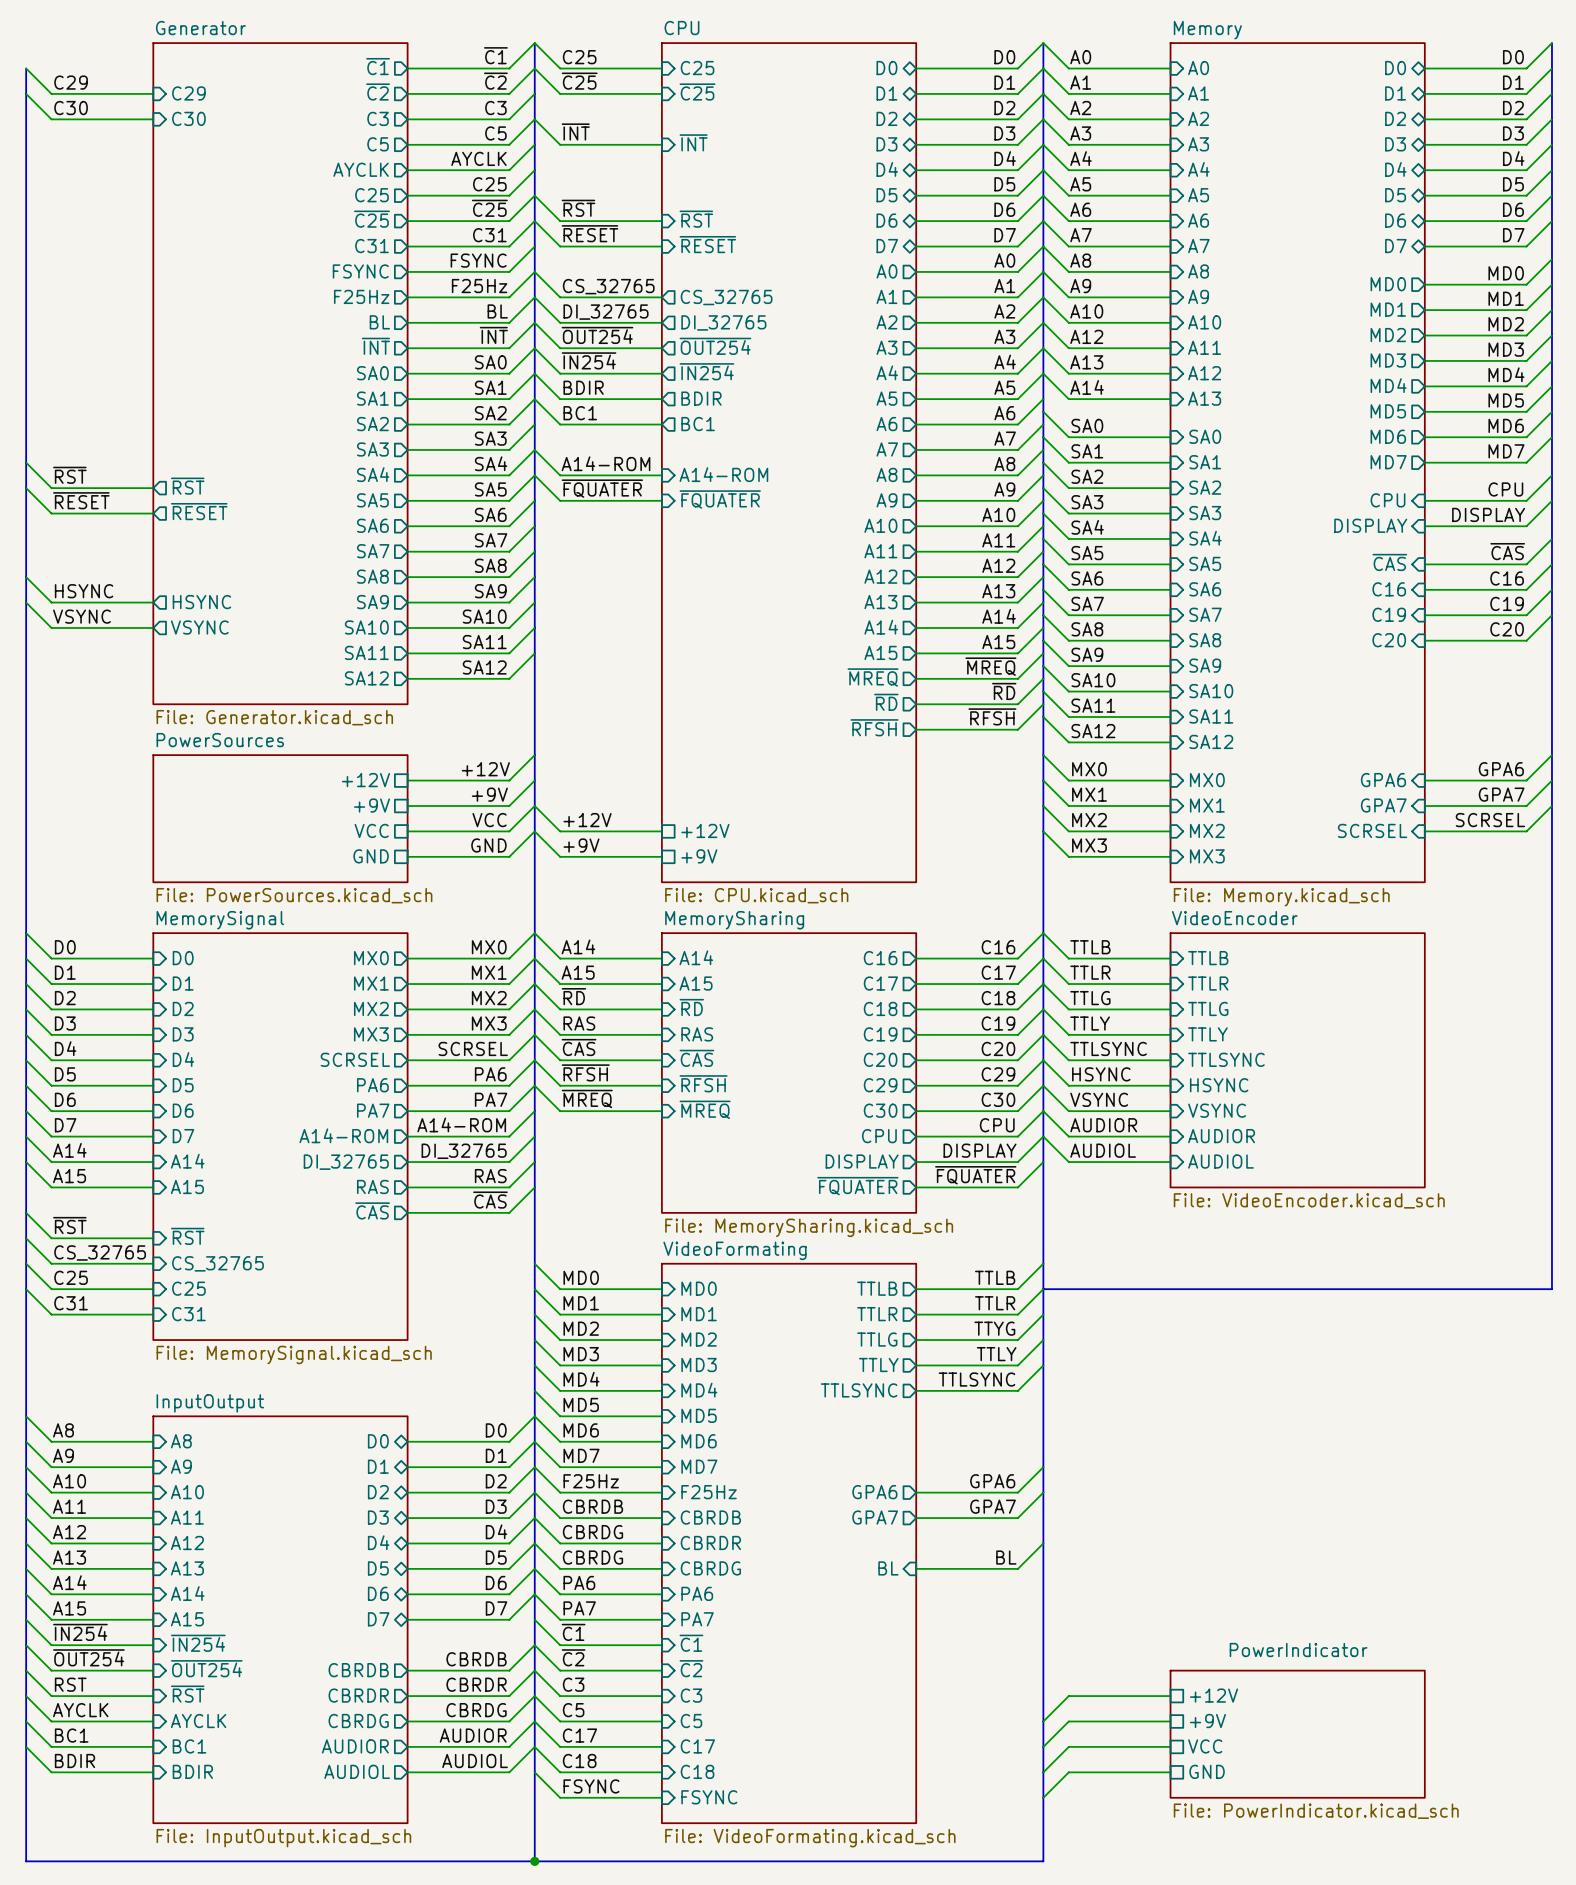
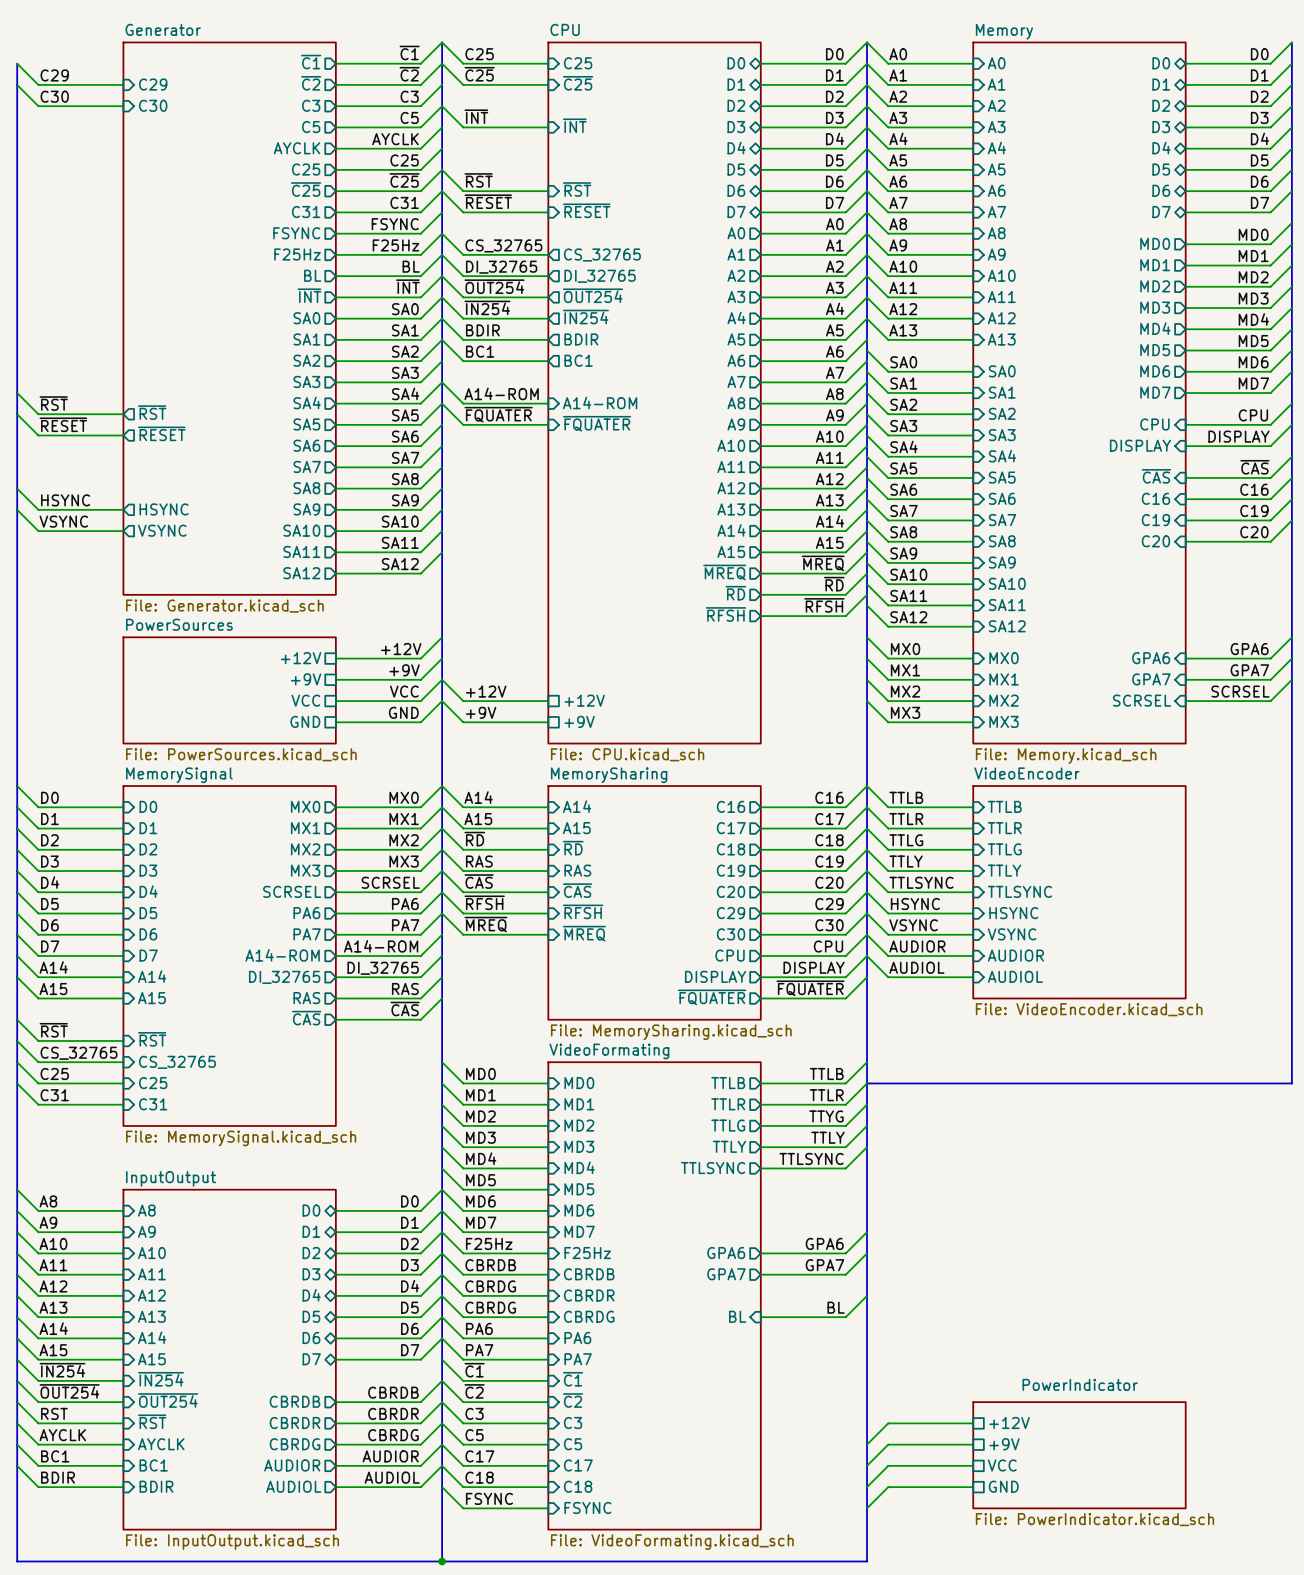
label: A12 (1086, 336) -> A11 (903, 287)
label: A13 (1086, 362) -> A12 (903, 309)
label: A14 (1087, 387) -> A13 (903, 330)

